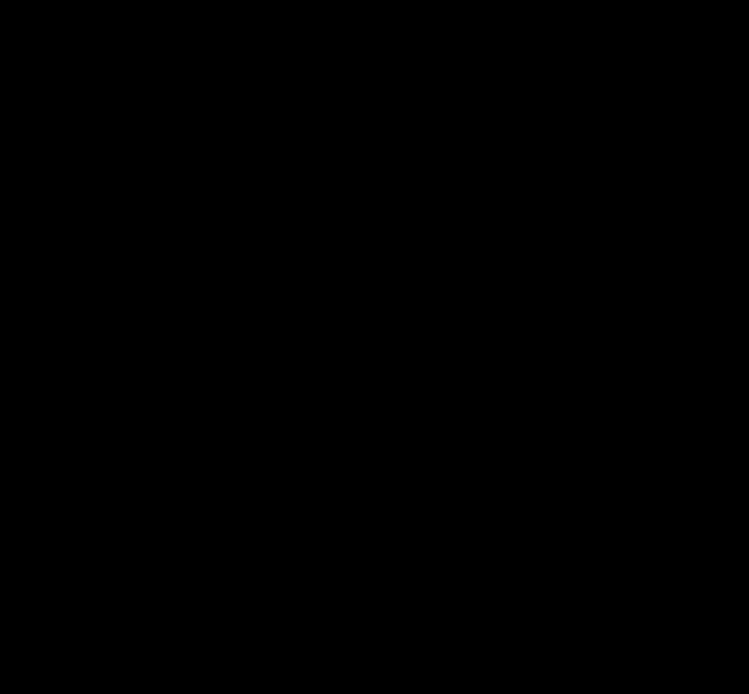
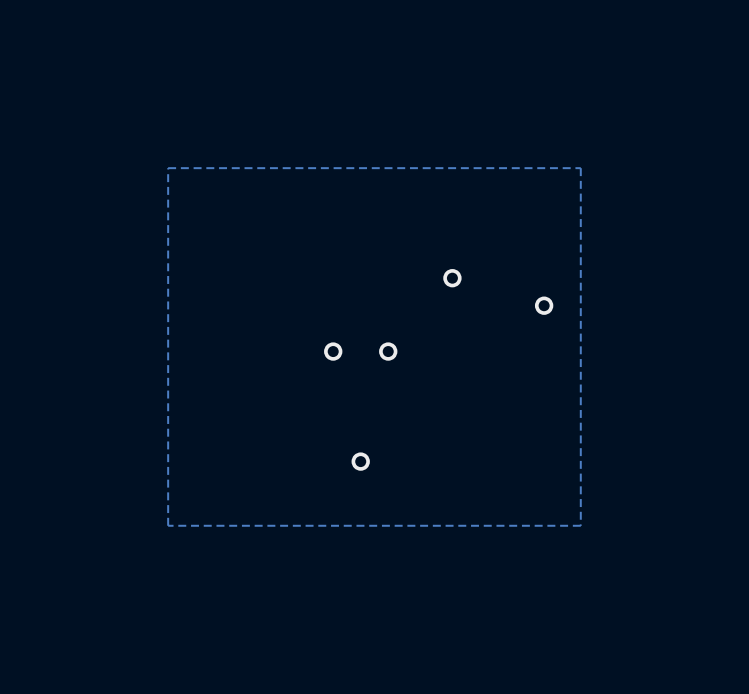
zone outline: none -> (580, 168) (580, 525) (168, 525) (168, 168) (580, 168)
via: none -> (452, 278)
via: none -> (544, 305)
via: none -> (333, 351)
via: none -> (388, 351)
via: none -> (360, 461)

